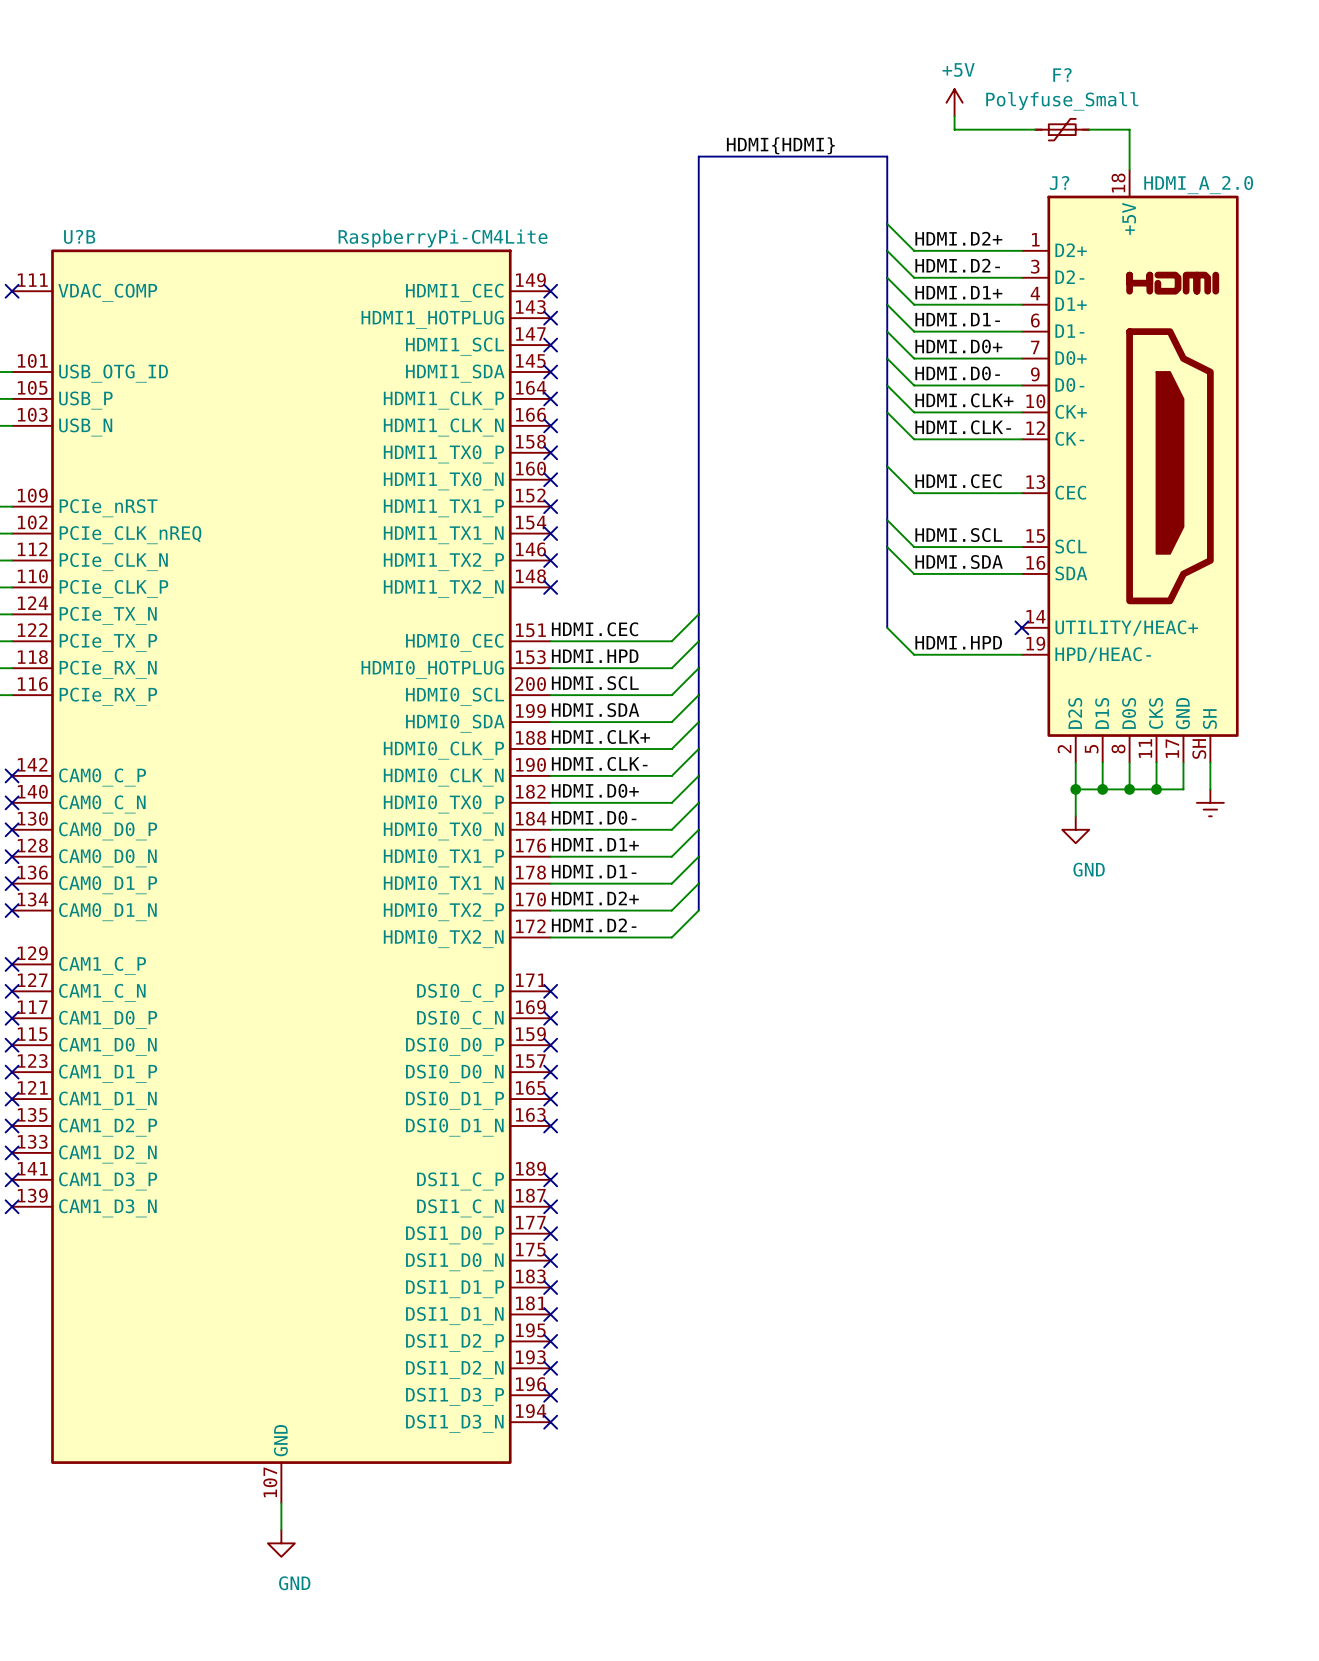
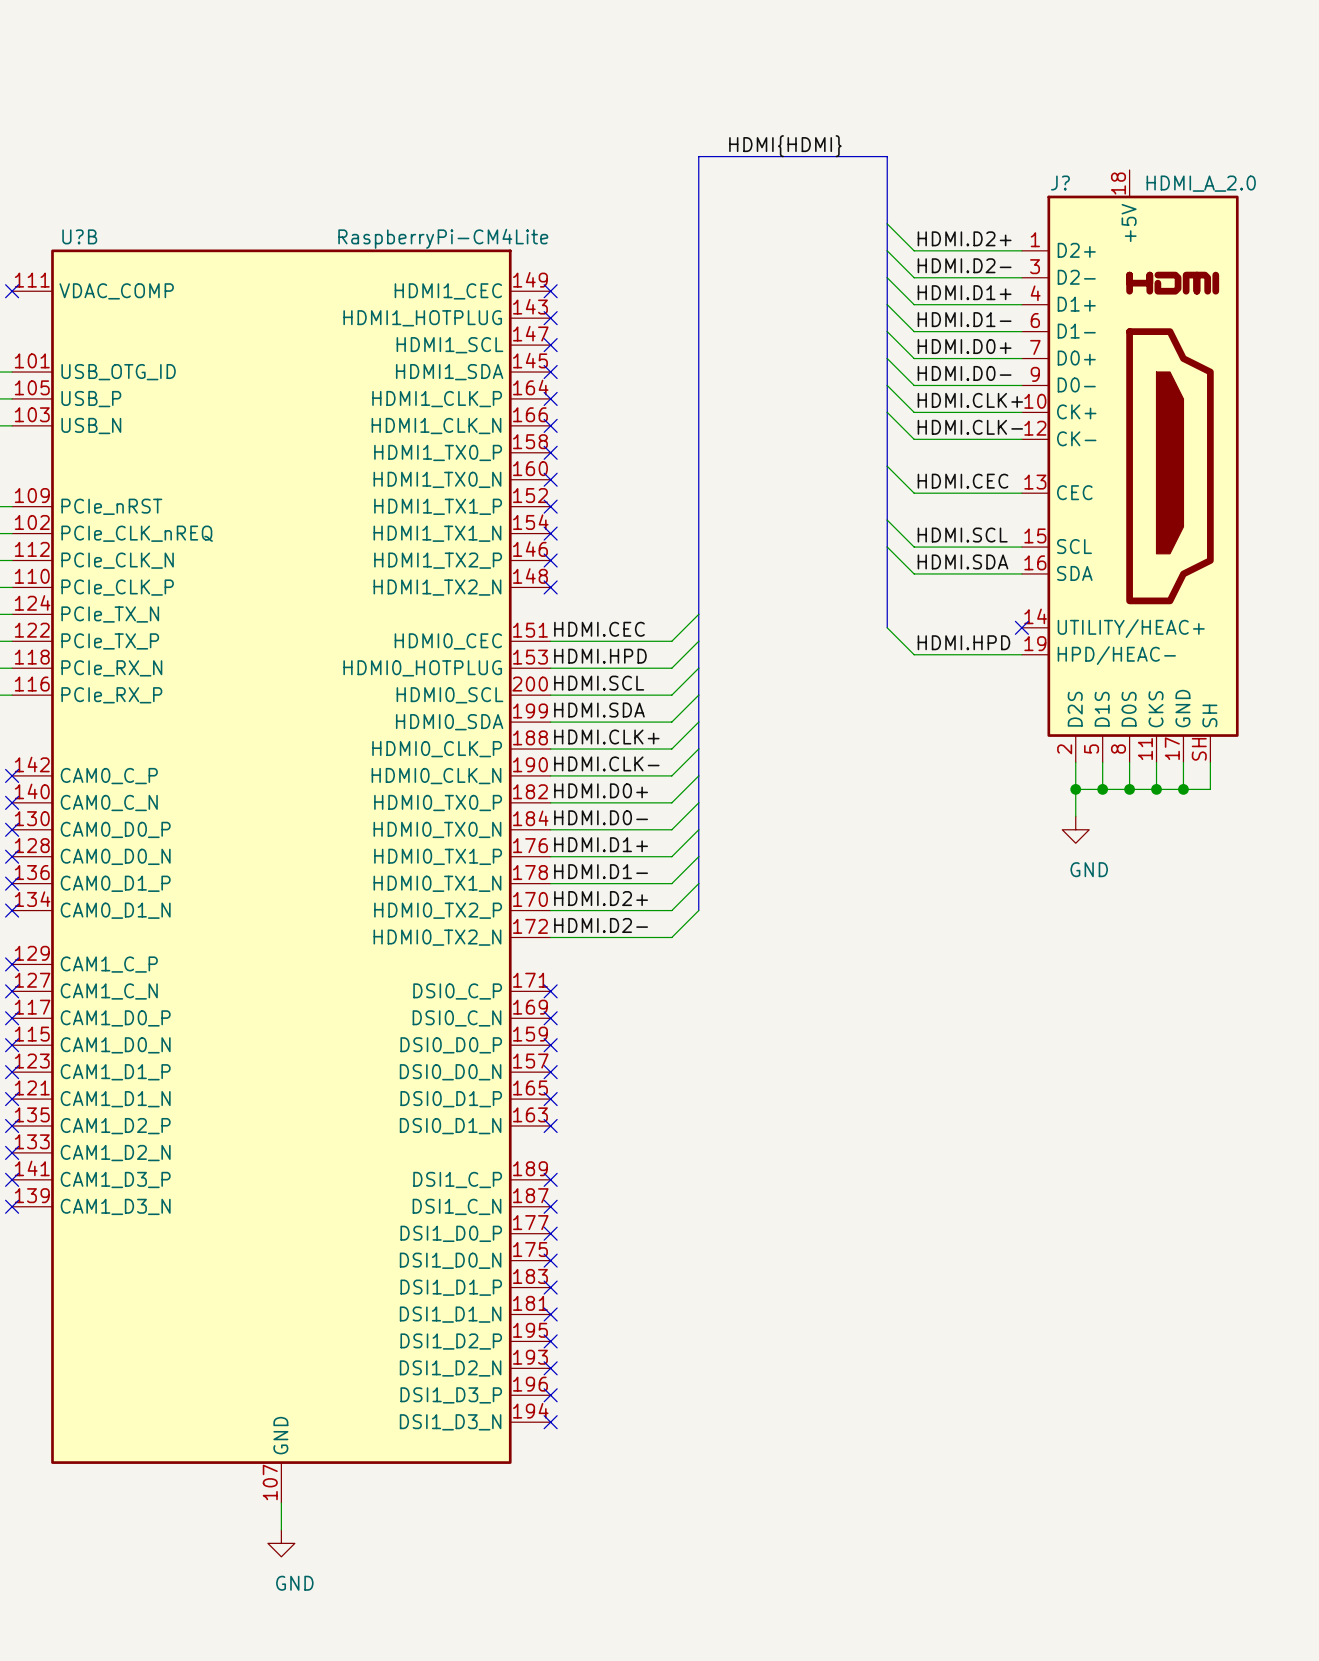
power symbol: +5V (954, 102) -> none
wire: (954, 116) (954, 129) (1035, 129) -> none
F?: Polyfuse_Small (1062, 129) -> none
wire: (1089, 129) (1129, 129) (1129, 170) -> none
wire: none -> (1183, 789) (1210, 789)
junction: none -> (1183, 789)
power symbol: (1210, 802) -> none

